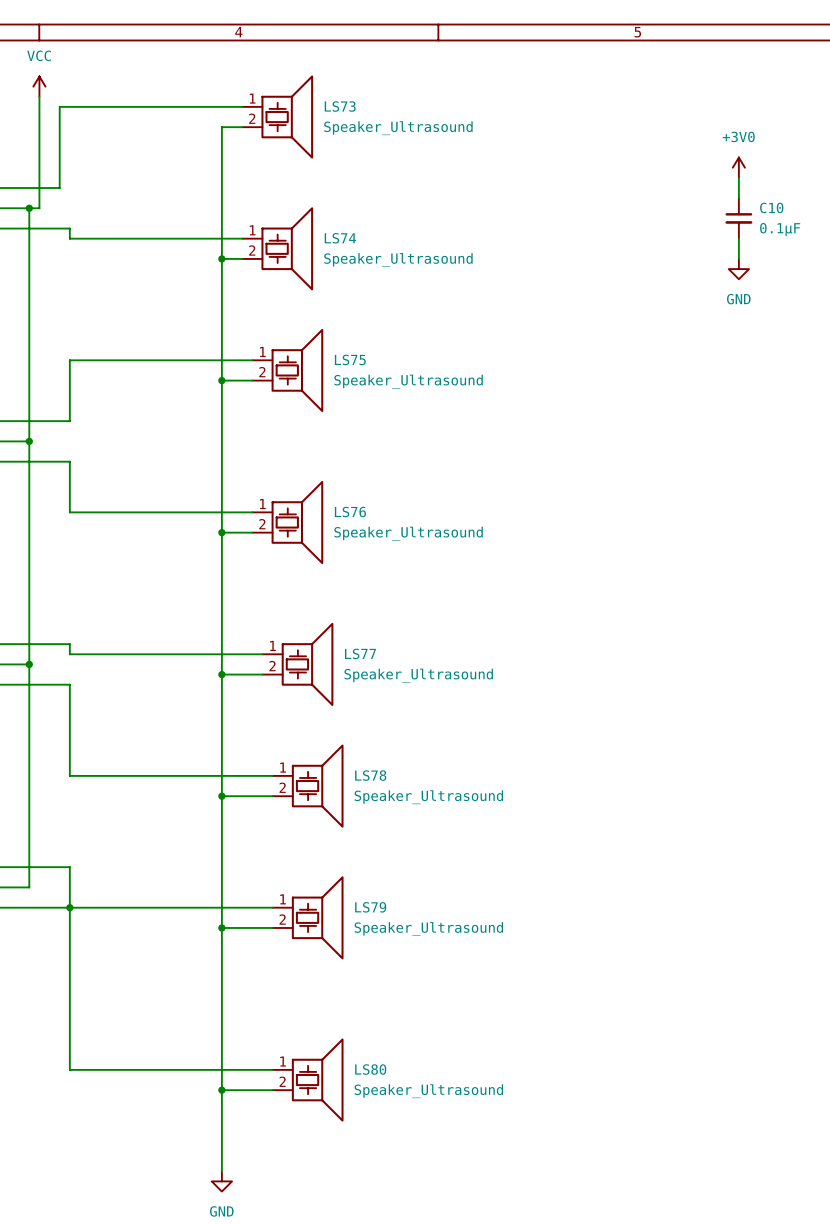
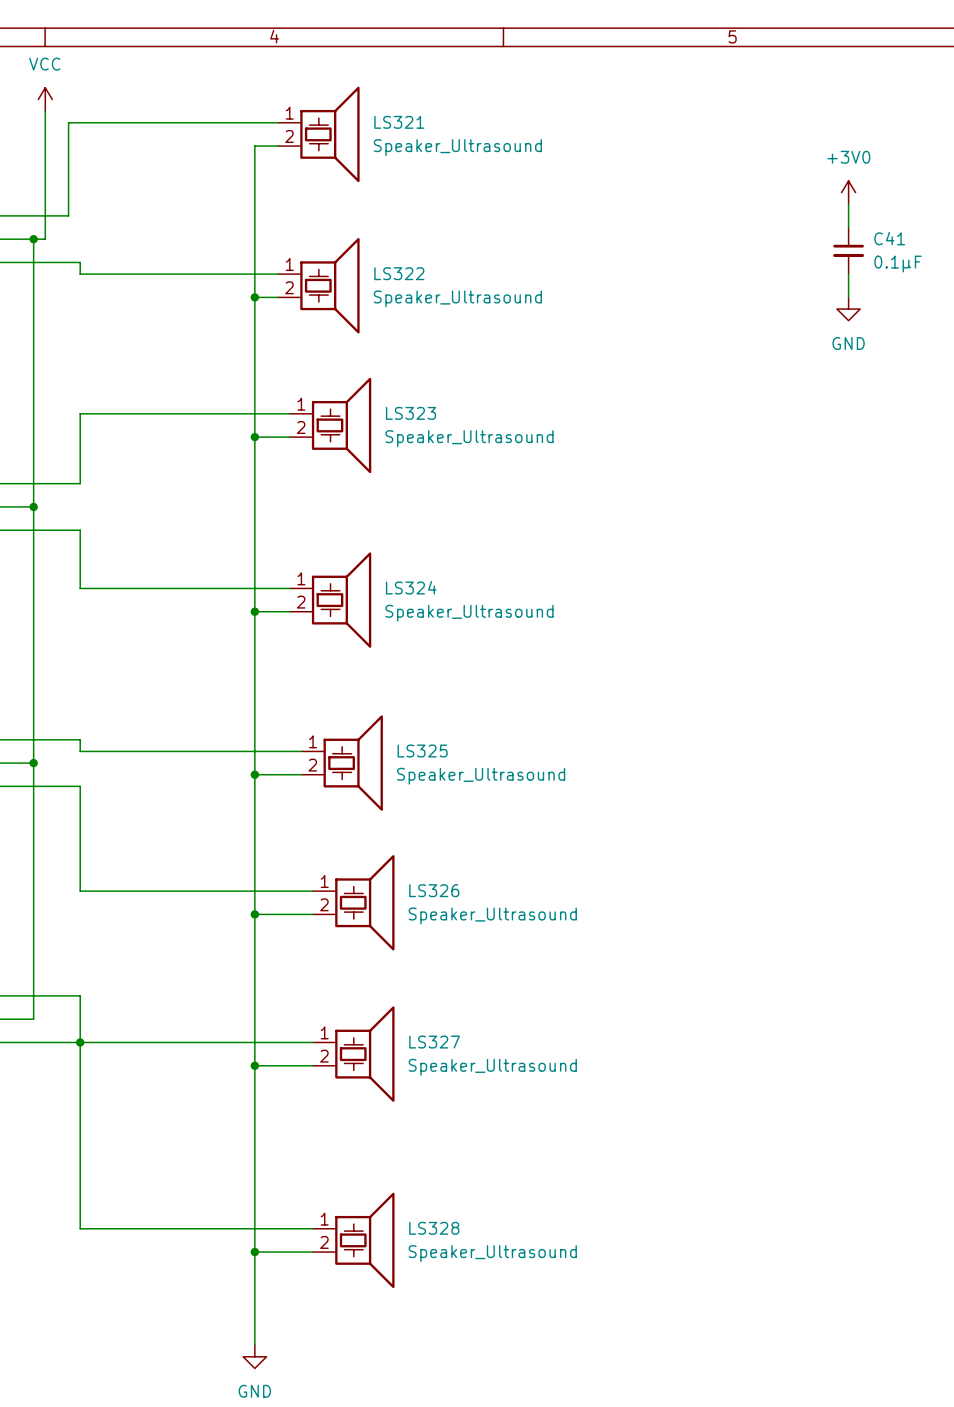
LS73 name: LS73 (340, 106) -> LS321 (399, 122)
C10 name: C10 (771, 207) -> C41 (889, 238)
LS74 name: LS74 (340, 238) -> LS322 (399, 273)
LS75 name: LS75 (350, 359) -> LS323 (410, 413)
LS76 name: LS76 (350, 512) -> LS324 (411, 587)
LS77 name: LS77 (360, 653) -> LS325 (422, 751)
LS78 name: LS78 (370, 775) -> LS326 (434, 890)
LS79 name: LS79 (370, 907) -> LS327 (434, 1042)
LS80 name: LS80 (370, 1069) -> LS328 (434, 1228)

